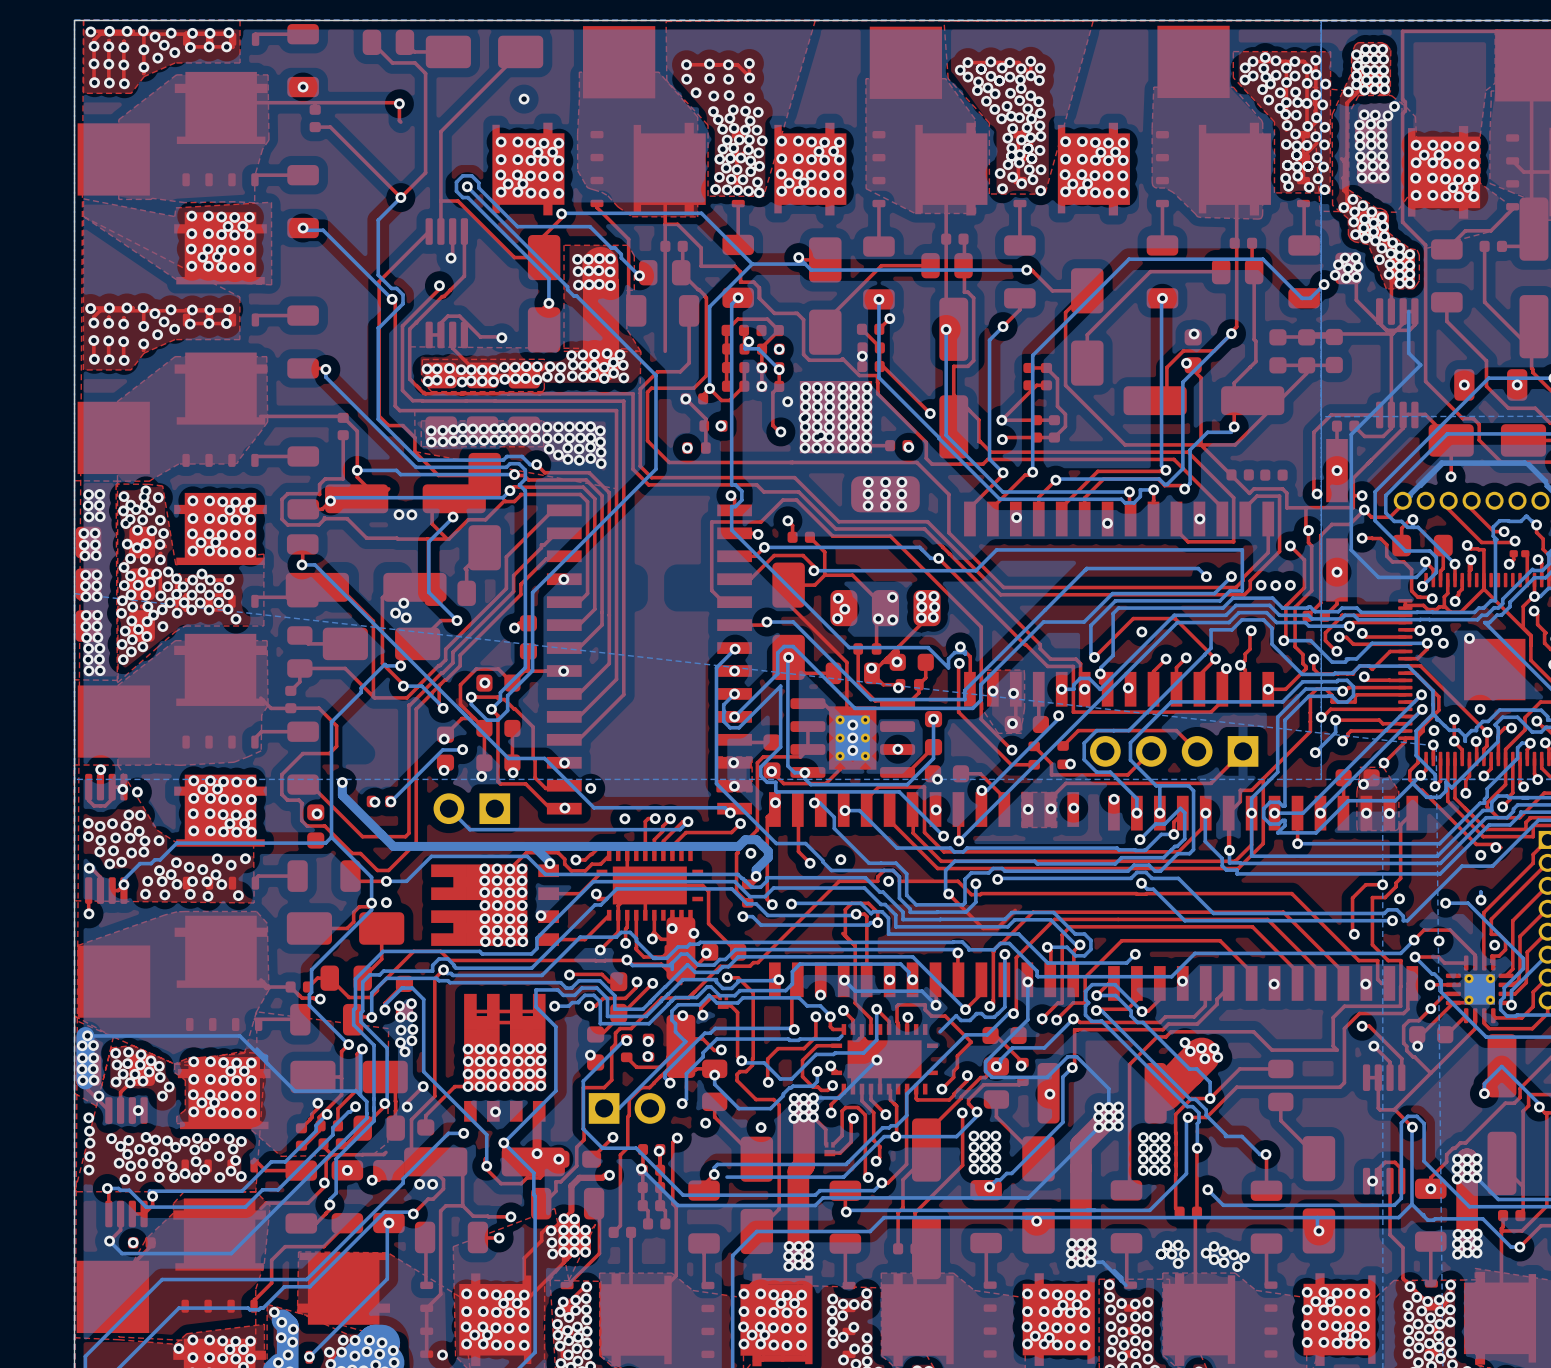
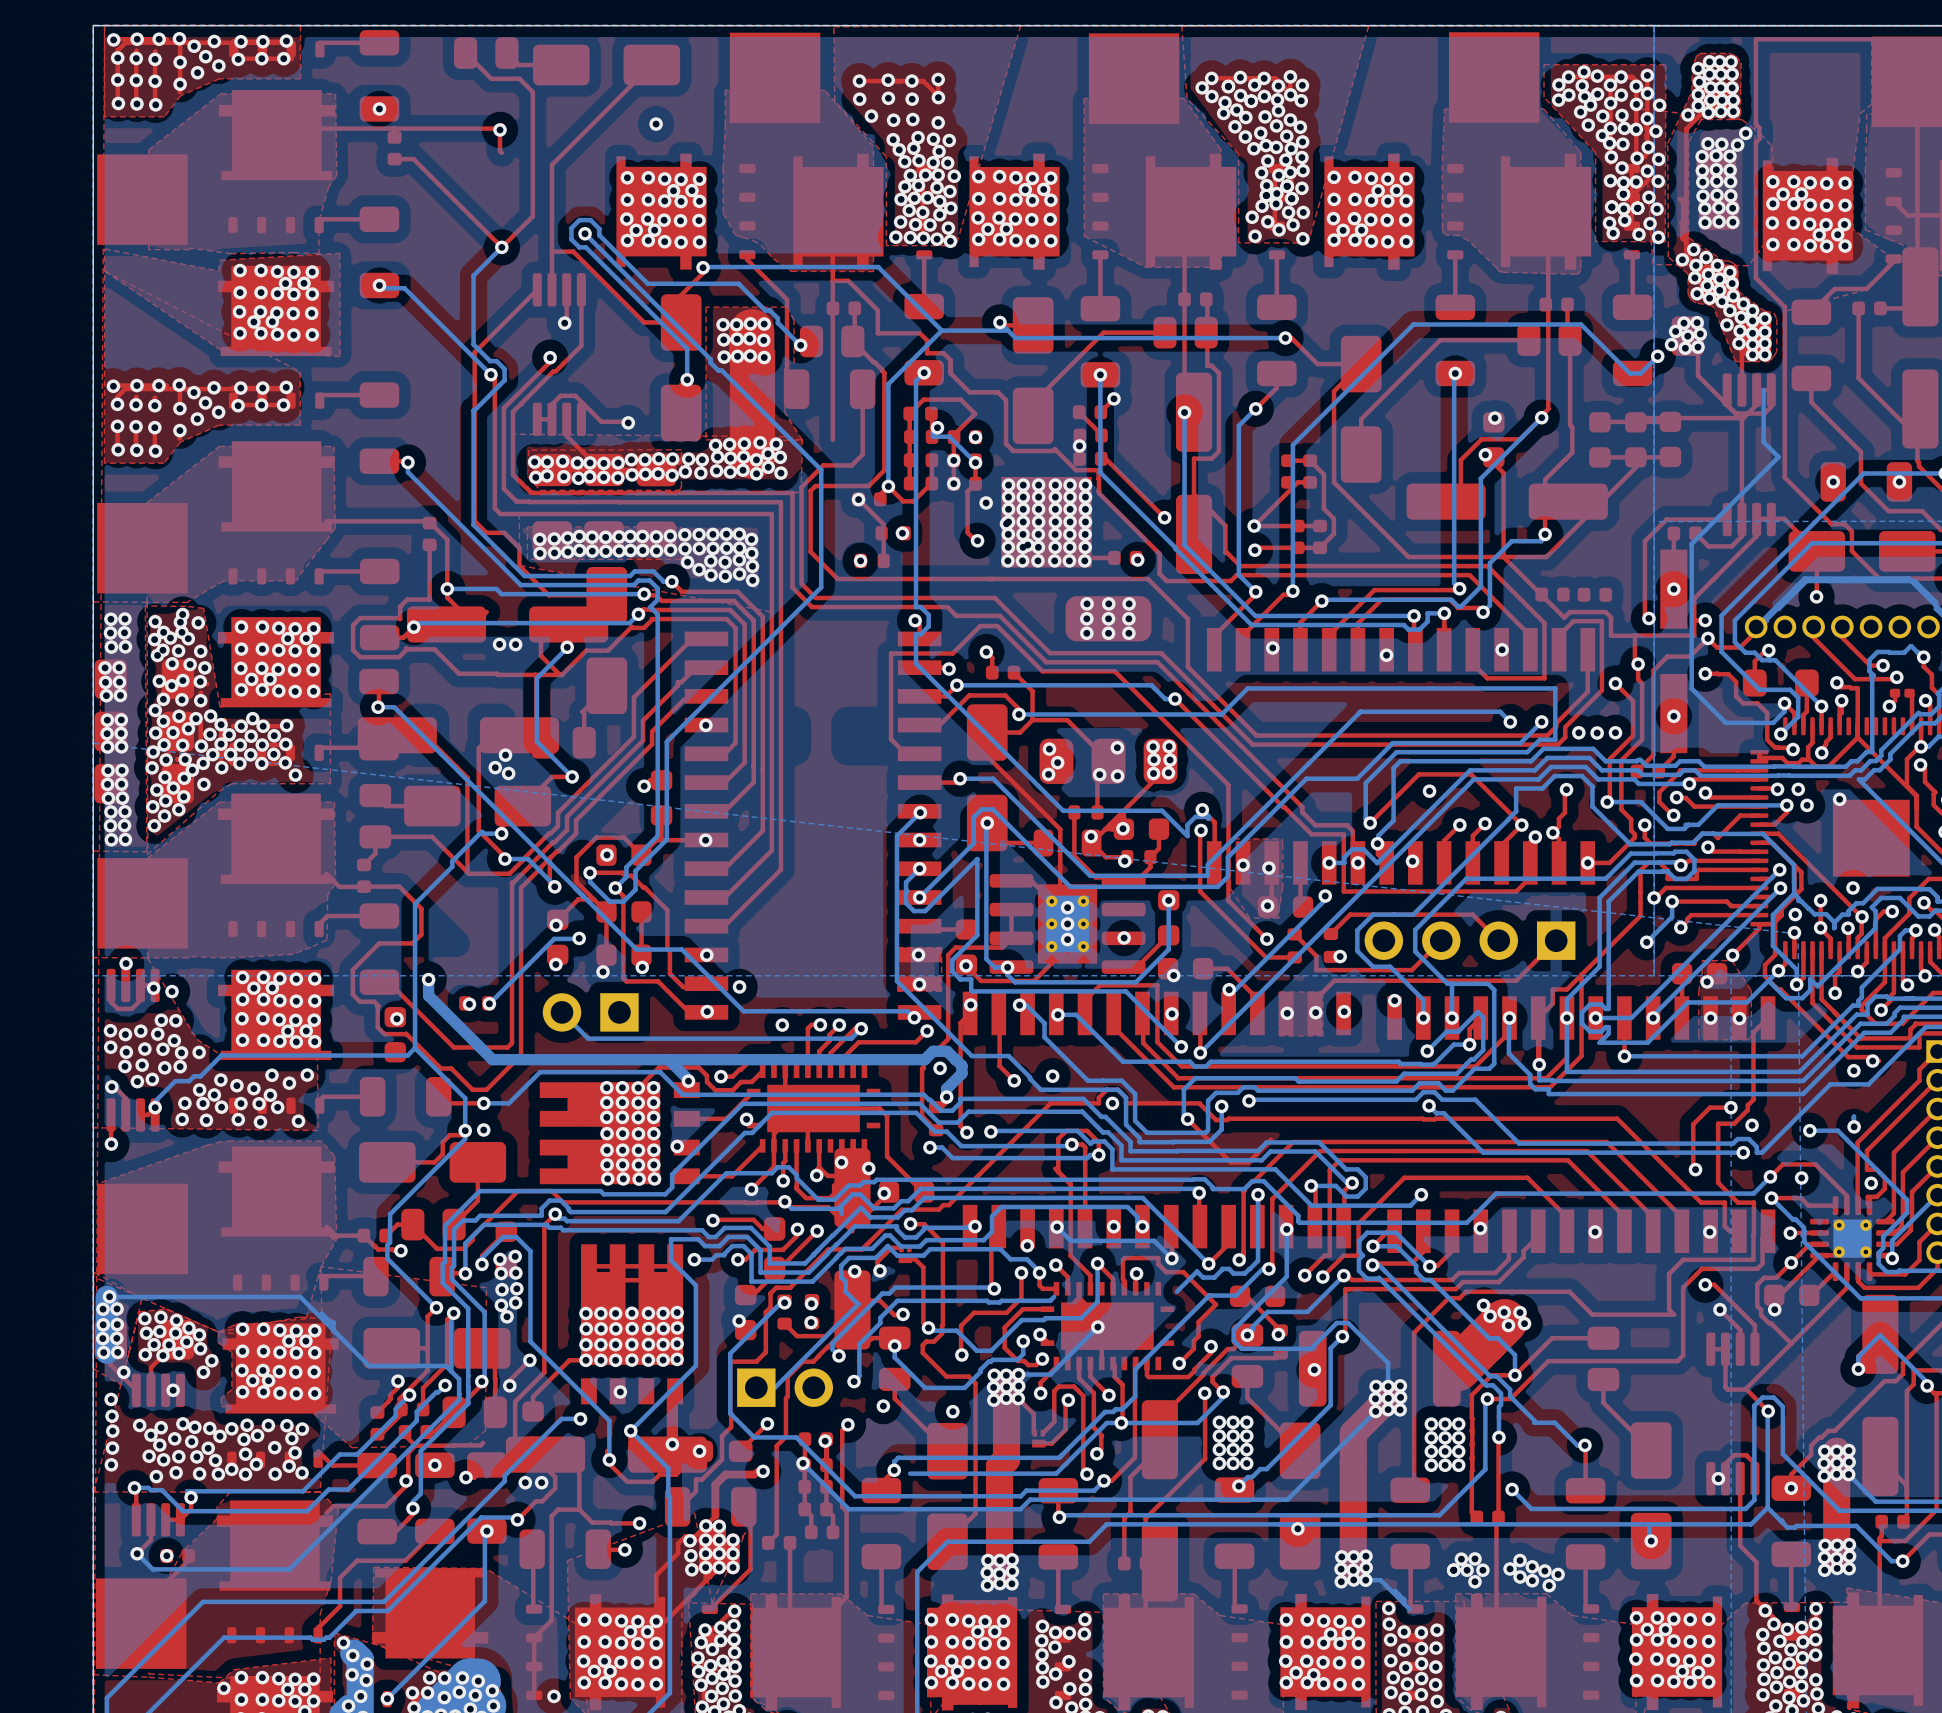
part: (770, 330) -> none

